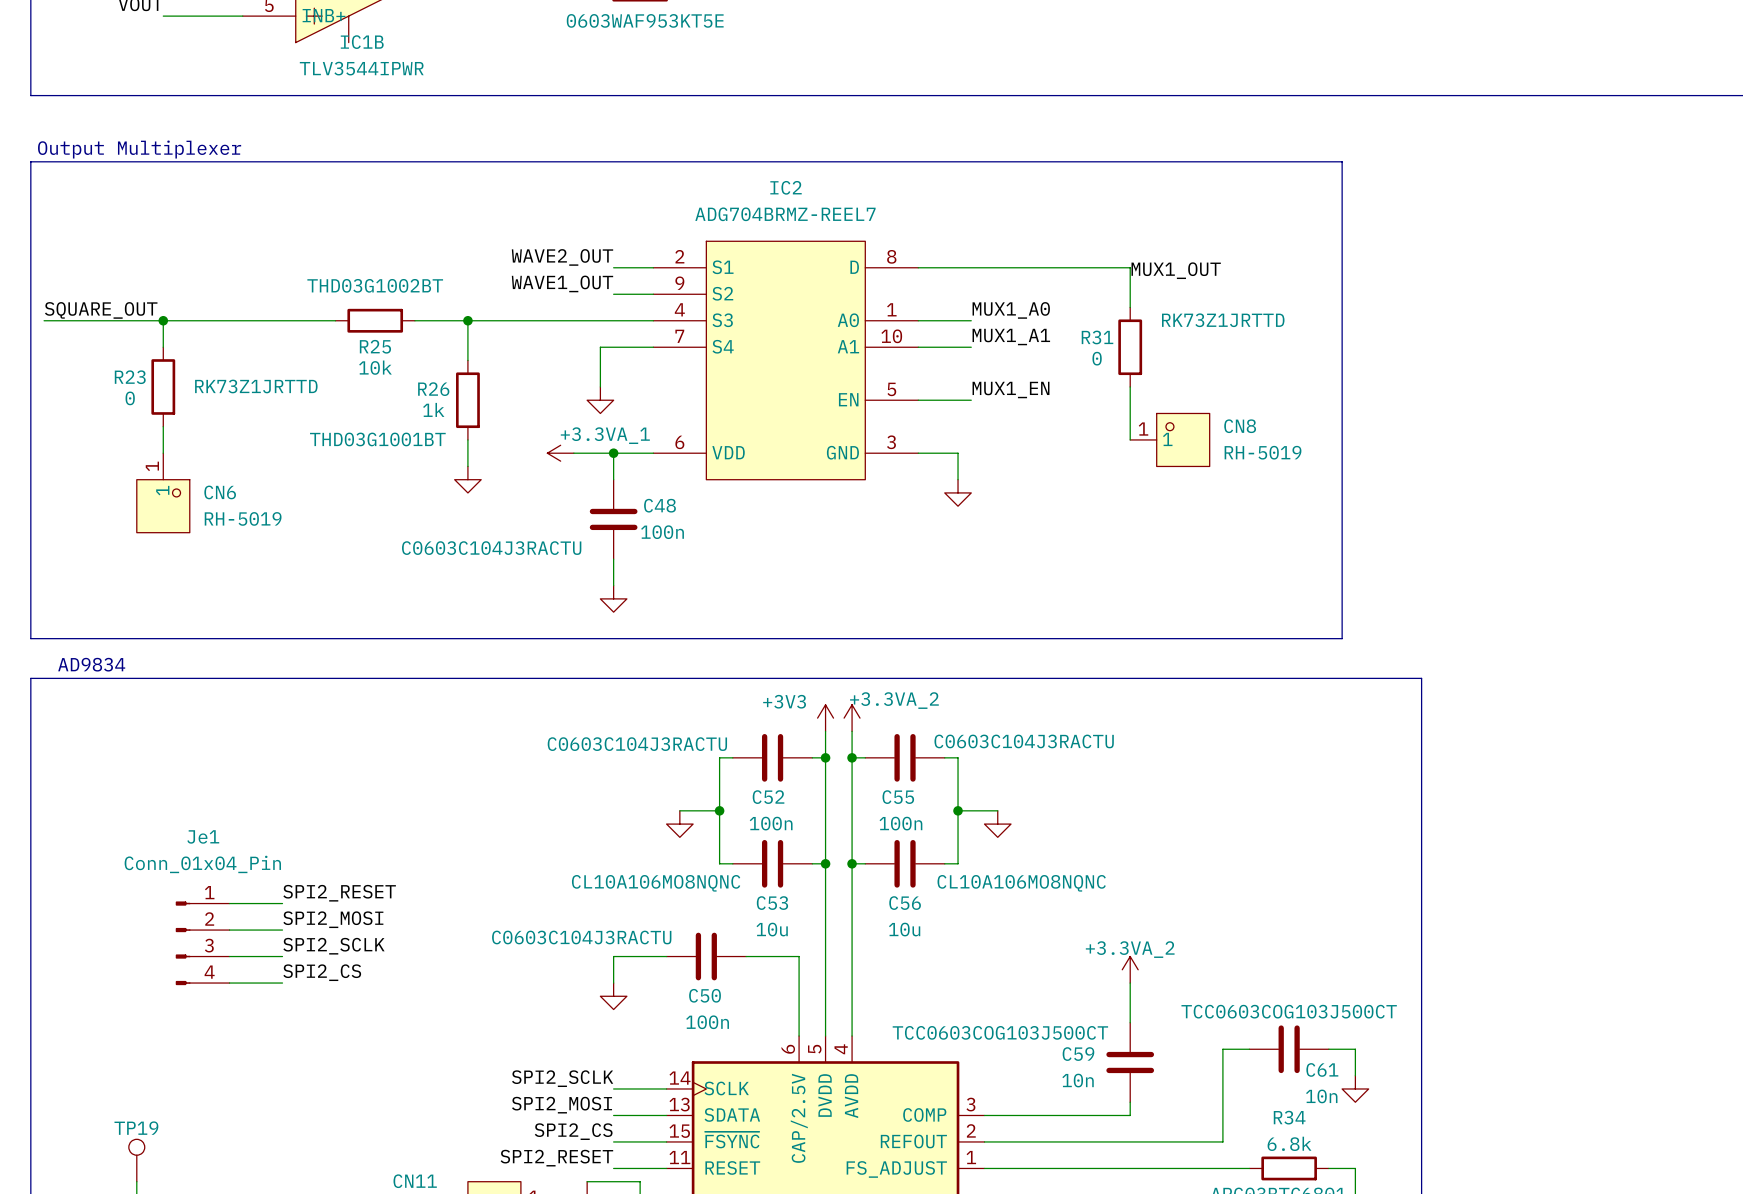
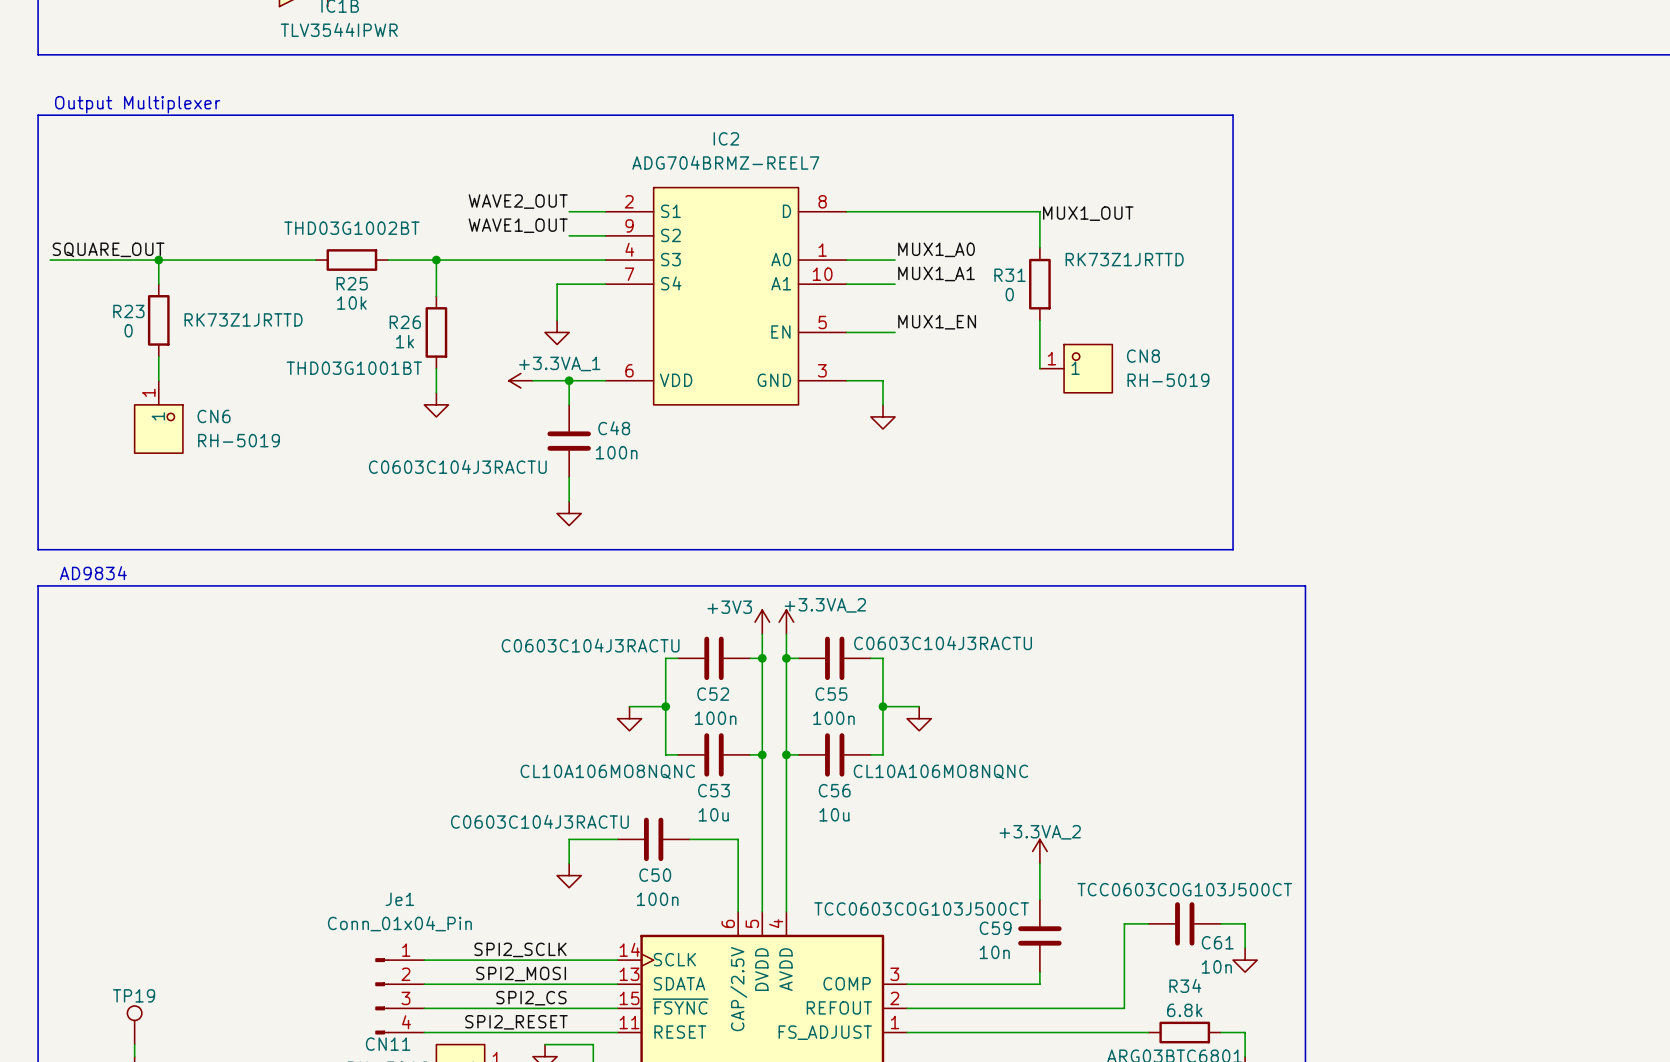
label: SPI2_RESET (339, 893) -> none
wire: (229, 903) (282, 903) -> none
label: SPI2_MOSI (333, 919) -> none
wire: (229, 930) (282, 930) -> none
Je1 position: (202, 943) -> (399, 996)
label: SPI2_SCLK (333, 946) -> none
wire: (229, 956) (282, 956) -> none
label: SPI2_CS (322, 972) -> none
wire: (229, 983) (282, 983) -> none
wire: none -> (424, 960) (569, 960)
wire: none -> (424, 984) (569, 984)
wire: none -> (424, 1008) (569, 1008)
wire: none -> (424, 1032) (569, 1032)

